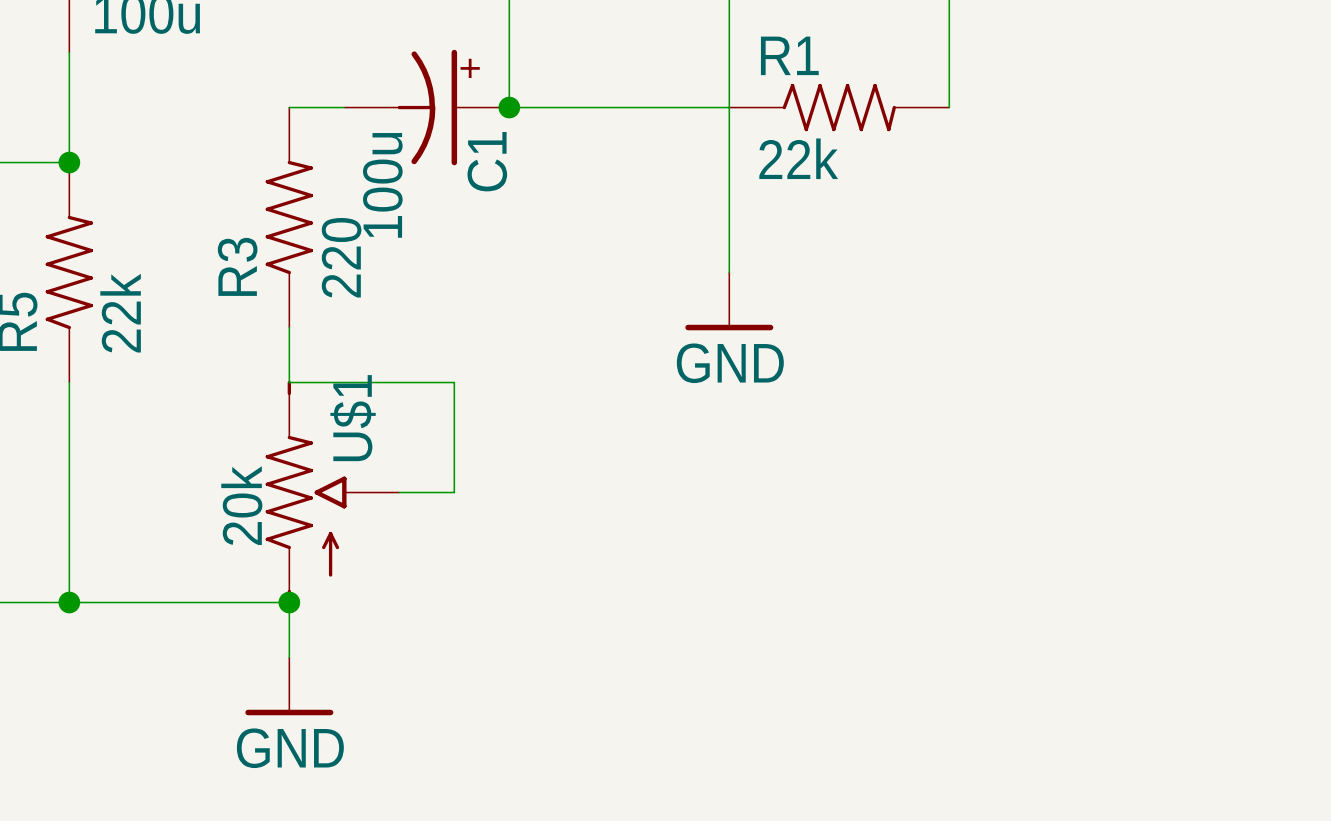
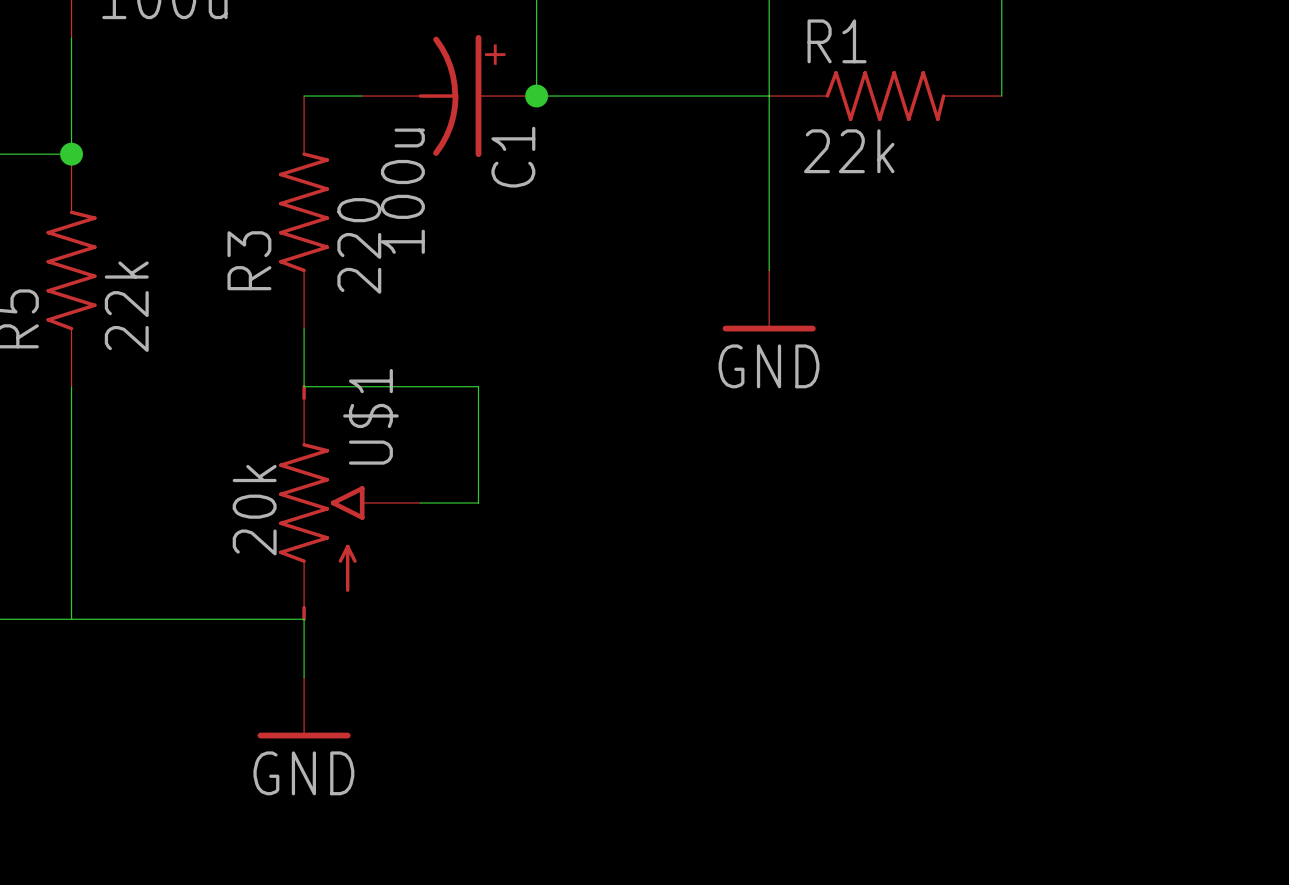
junction: (69, 602) -> none
junction: (289, 602) -> none

